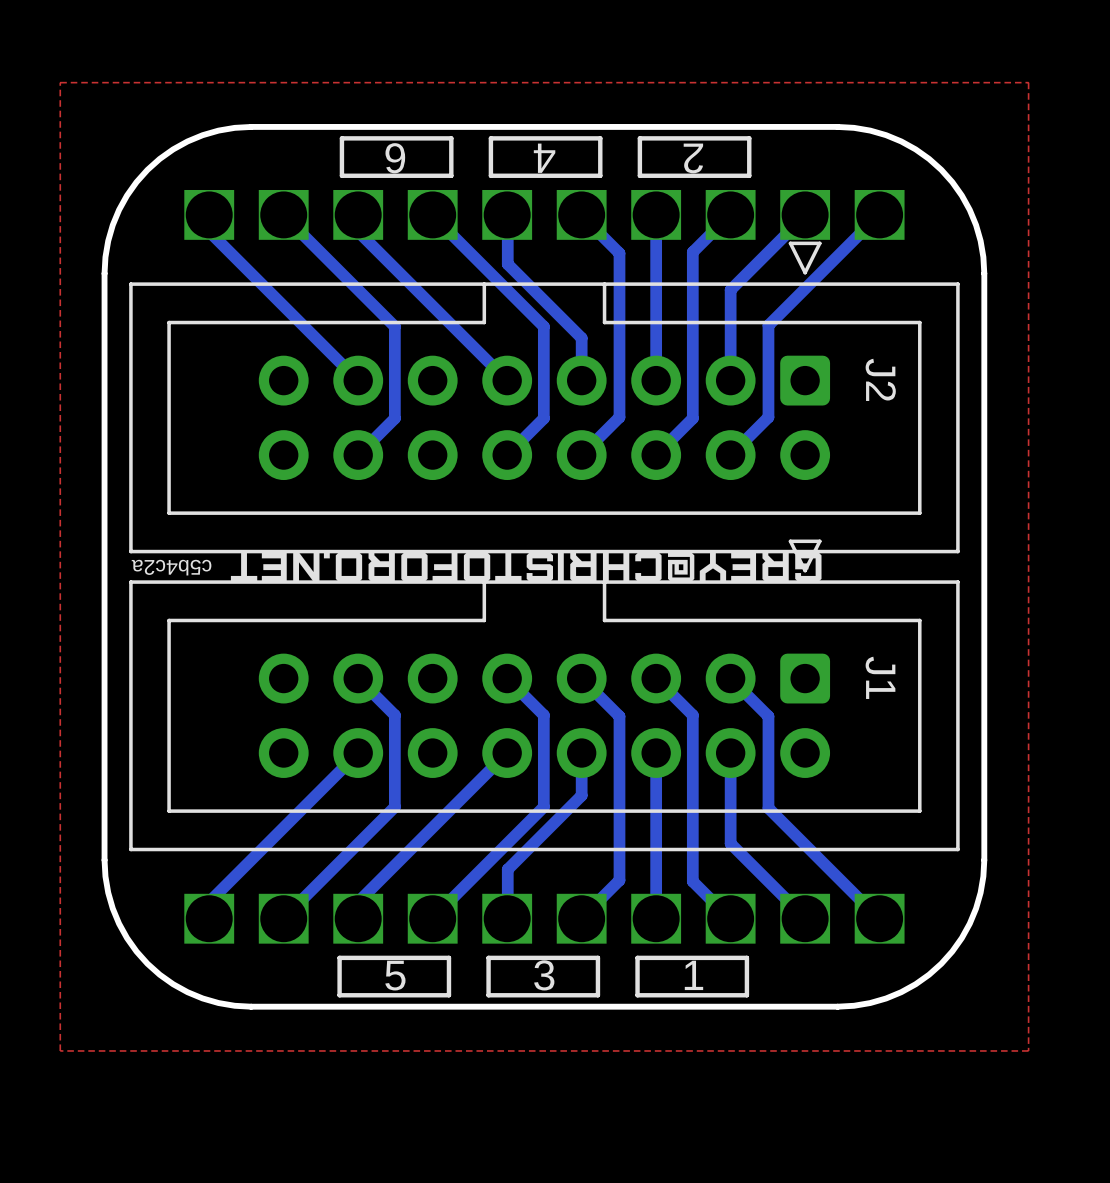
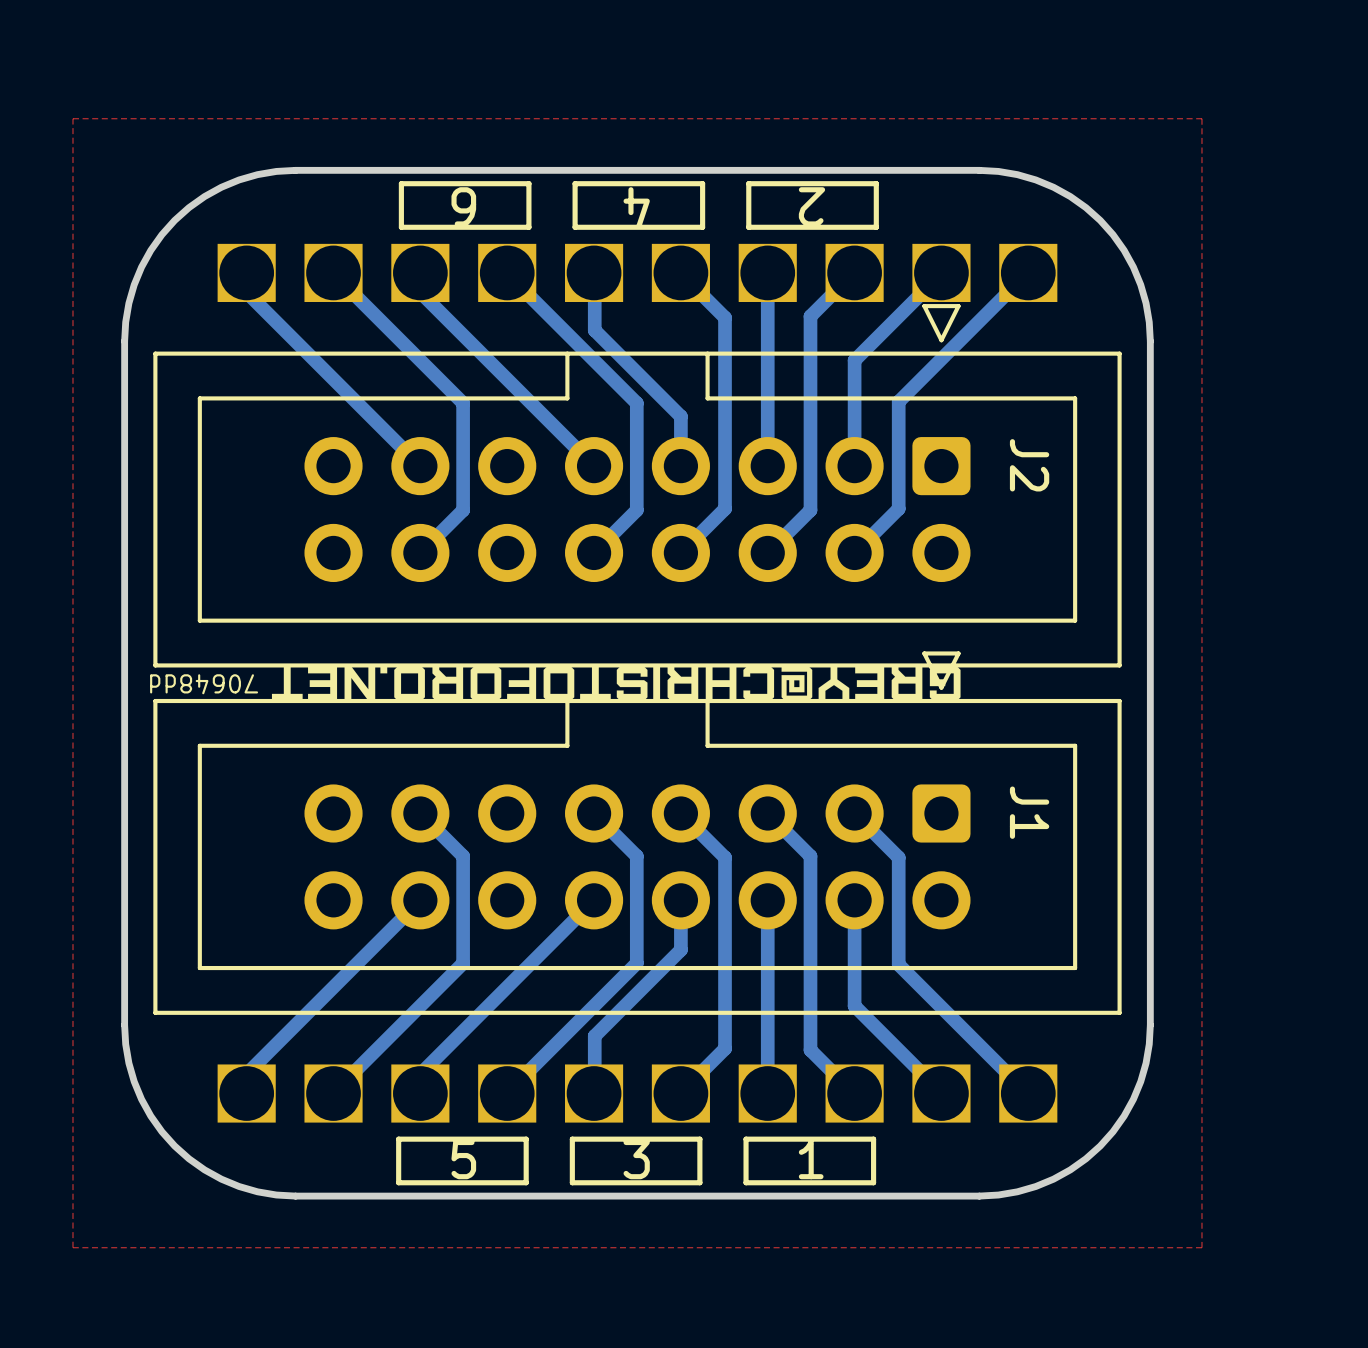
text: c5b4c2a (171, 567) -> 70648dd (204, 684)

